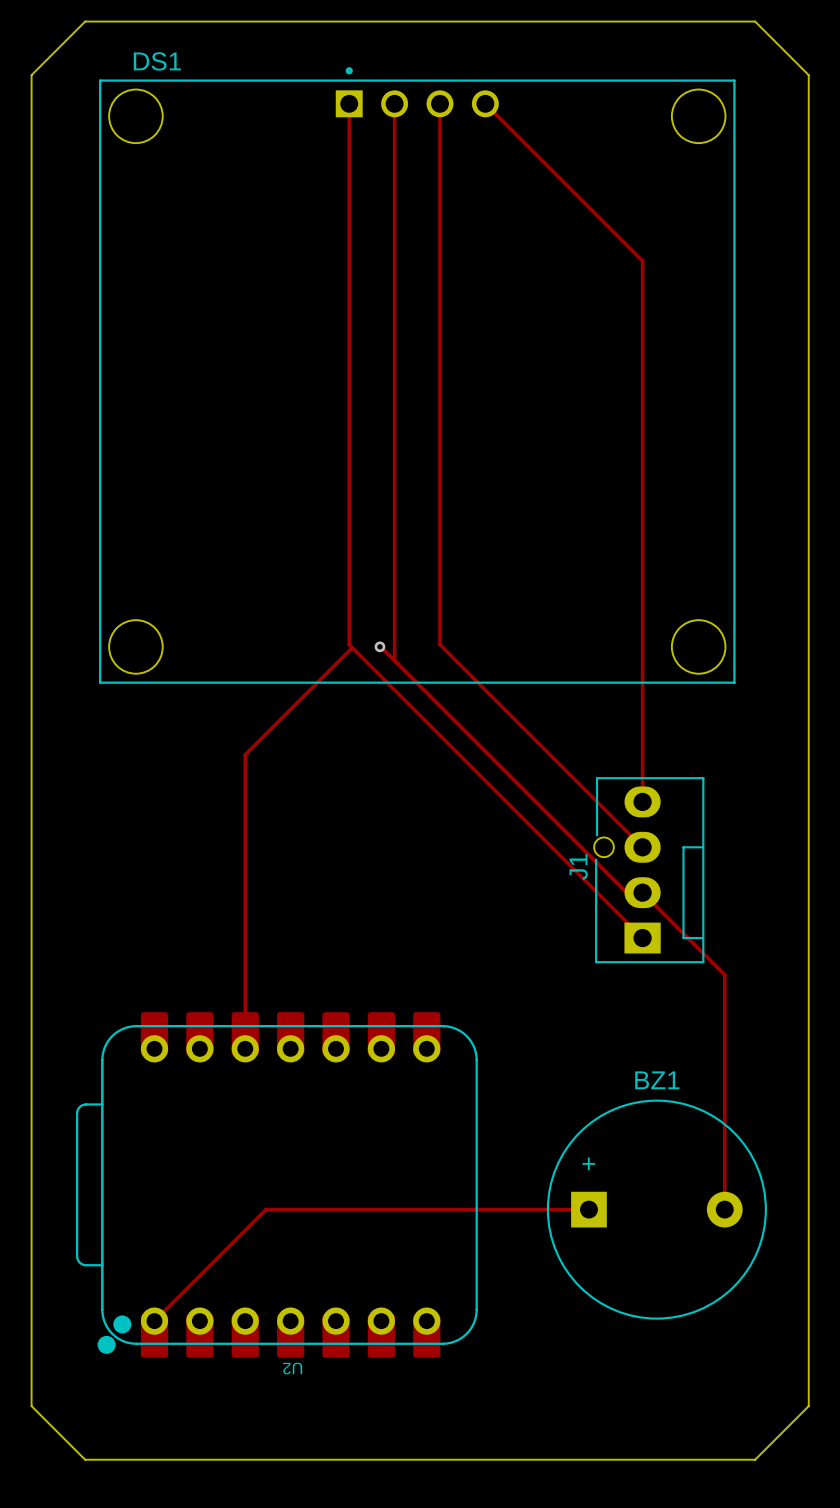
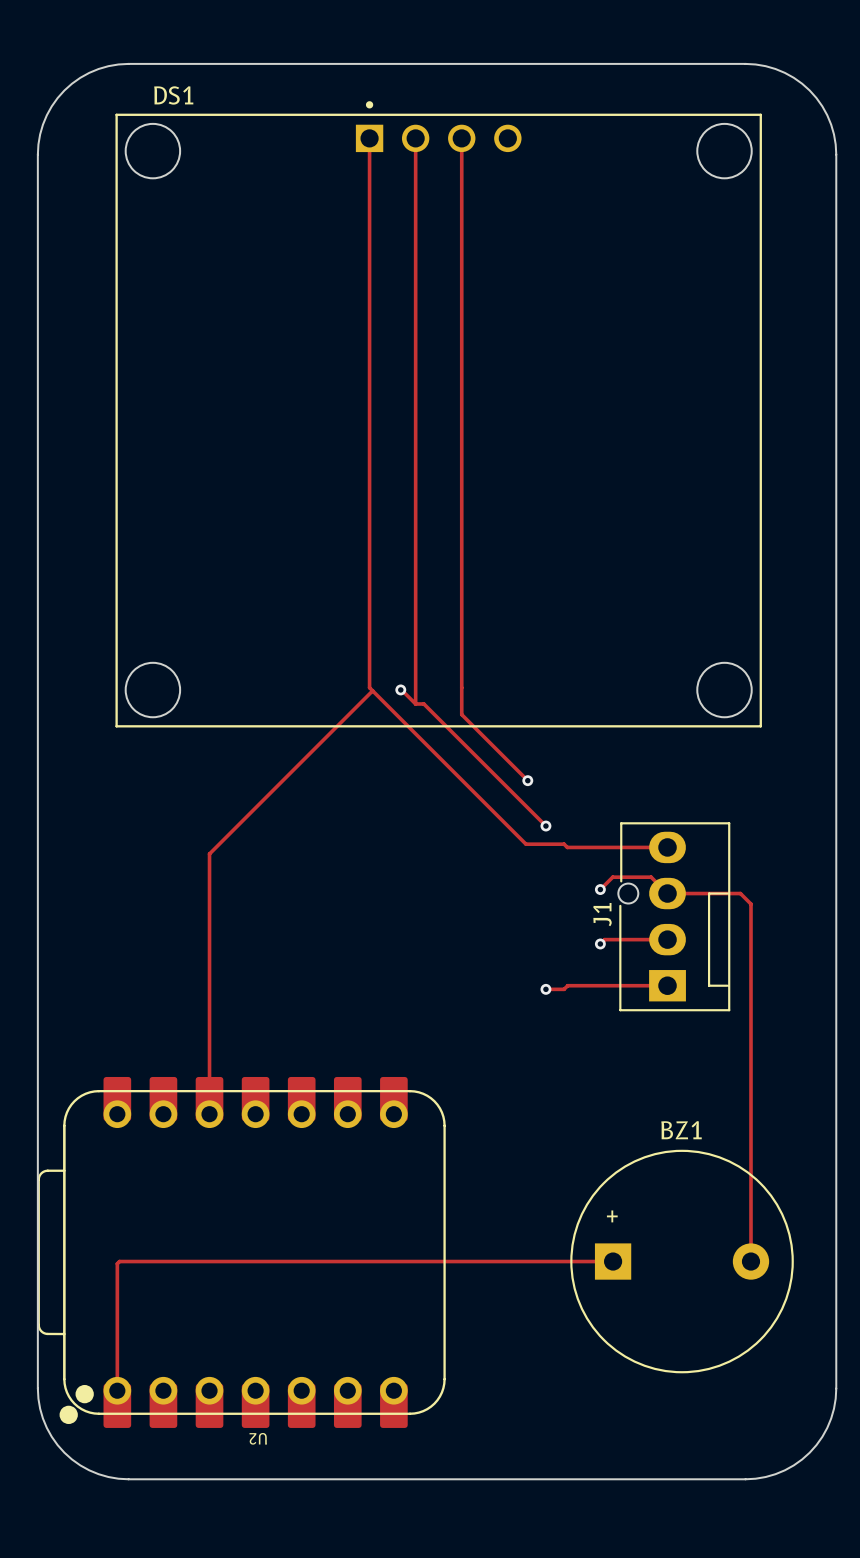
track: (485, 103) (642, 261) (642, 801) -> none
board edge: (808, 119) (808, 75) (755, 21) (85, 21) (31, 75) (31, 1406) (85, 1459) (755, 1459) (808, 1406) (808, 1334) -> (836, 154) (831, 124) (822, 106) (809, 90) (793, 77) (775, 69) (745, 63) (118, 64) (89, 72) (72, 83) (57, 98) (42, 124) (37, 154) (37, 1388) (42, 1418) (51, 1436) (64, 1452) (80, 1465) (98, 1474) (118, 1478) (755, 1478) (775, 1474) (793, 1465) (816, 1445) (831, 1418) (836, 1388)
track: (439, 644) (626, 831) -> (461, 687) (461, 714) (527, 780)
track: (394, 660) (626, 892) -> (415, 703) (423, 703) (545, 826)
via: none -> (527, 780)
track: (245, 754) (245, 1048) -> (263, 799) (209, 853) (209, 1114)
via: none -> (545, 826)
track: (503, 798) (642, 938) -> (525, 844) (564, 844) (567, 847) (667, 847)
track: none -> (651, 877) (612, 877) (600, 889)
via: none -> (600, 889)
track: none -> (651, 939) (604, 939) (600, 943)
track: (642, 892) (724, 974) -> (667, 893) (740, 893) (750, 904) (750, 1023)
via: none -> (600, 943)
track: none -> (667, 985) (567, 985) (564, 989) (545, 989)
via: none -> (545, 989)
U2 position: (276, 1184) -> (241, 1252)
track: (265, 1209) (154, 1321) -> (285, 1261) (119, 1261) (117, 1263) (117, 1390)

